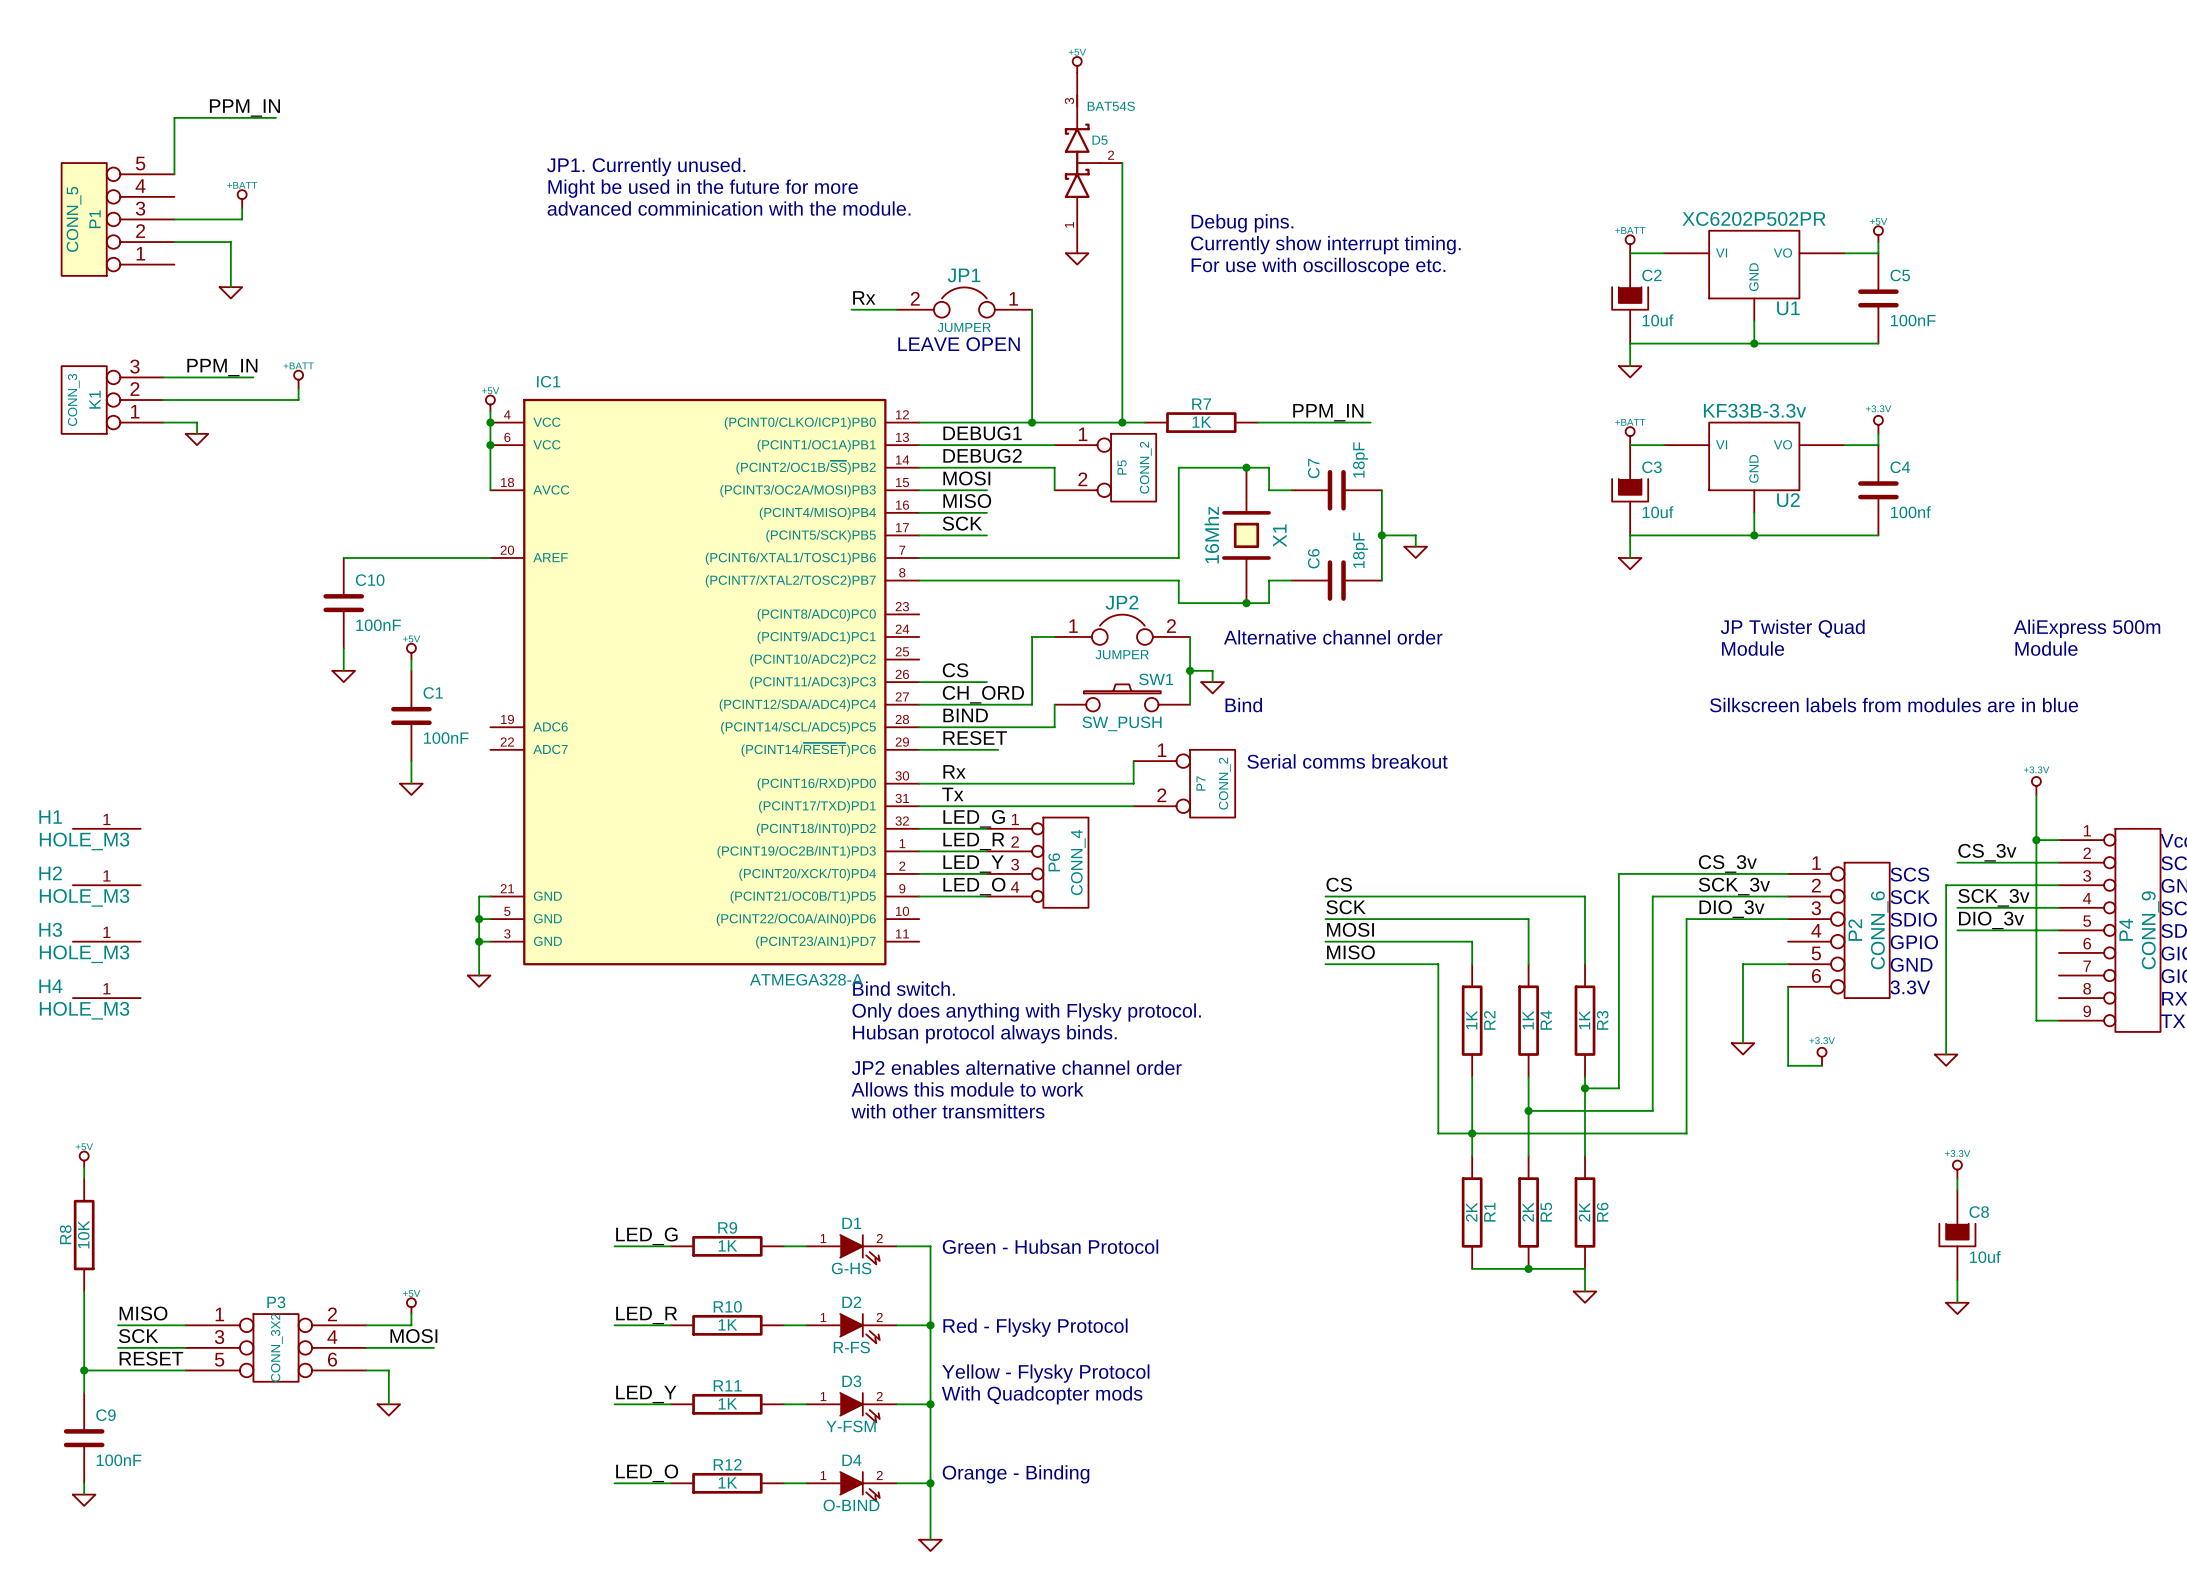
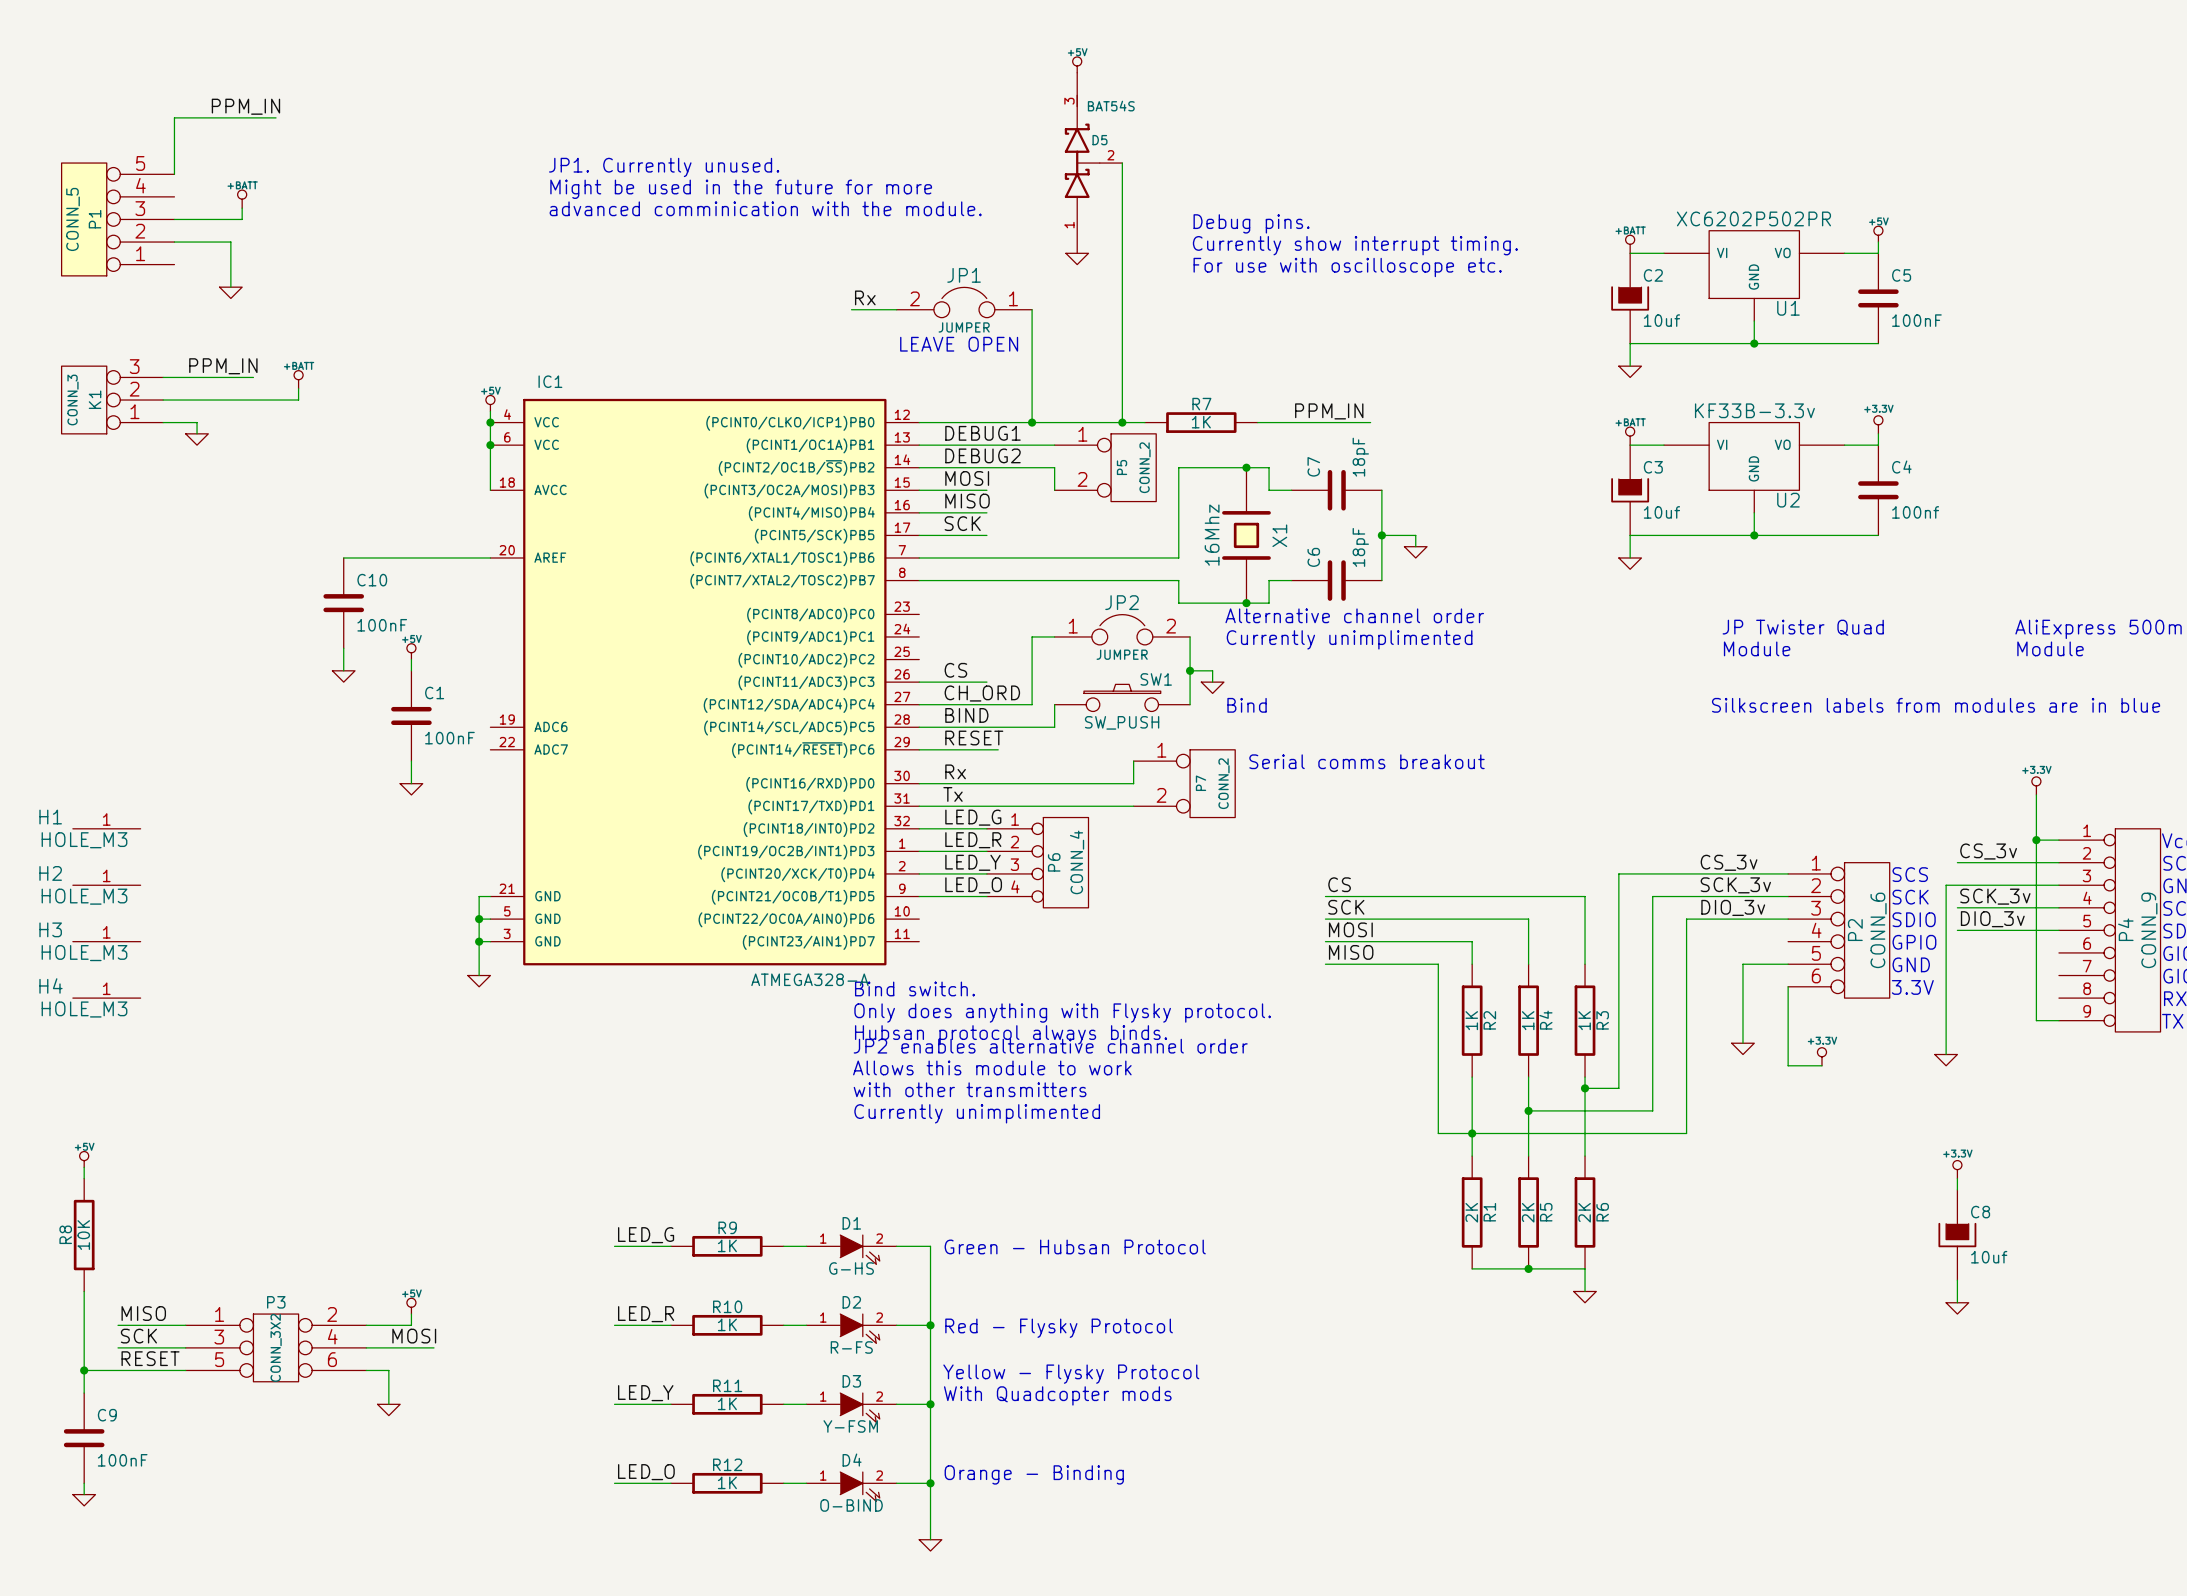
text: none -> Alternative channel order (1354, 615)
text: Alternative channel order (1333, 637) -> Currently unimplimented (1349, 639)
text: none -> JP2 enables alternative channel order (1050, 1046)
text: JP2 enables alternative channel order (1016, 1067) -> Allows this module to work (992, 1067)
text: Allows this module to work (967, 1089) -> with other transmitters (970, 1089)
text: with other transmitters (947, 1111) -> Currently unimplimented (977, 1113)

